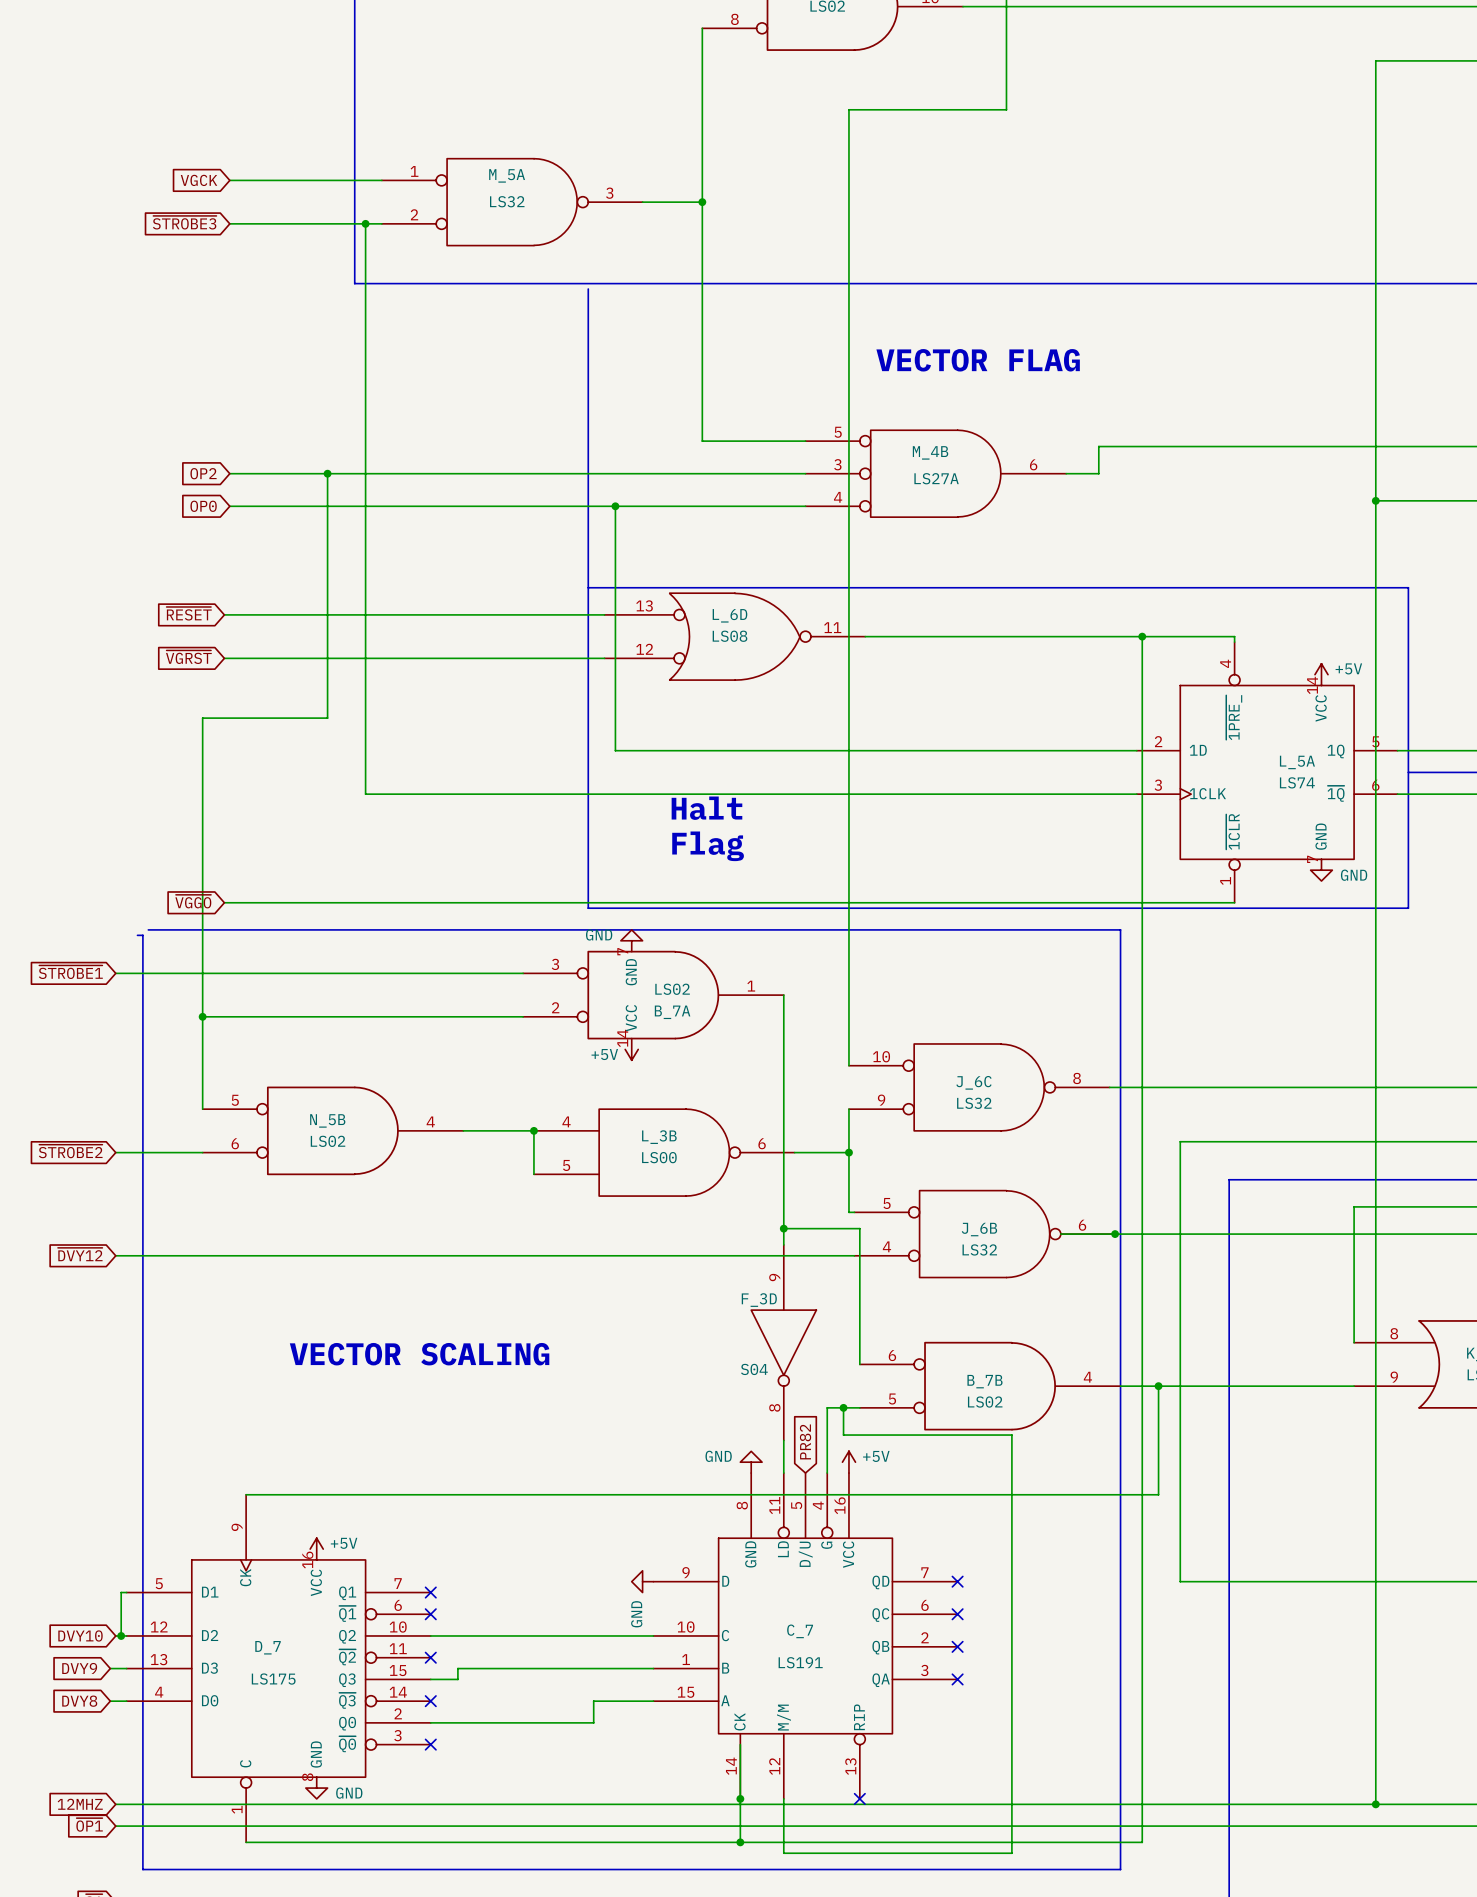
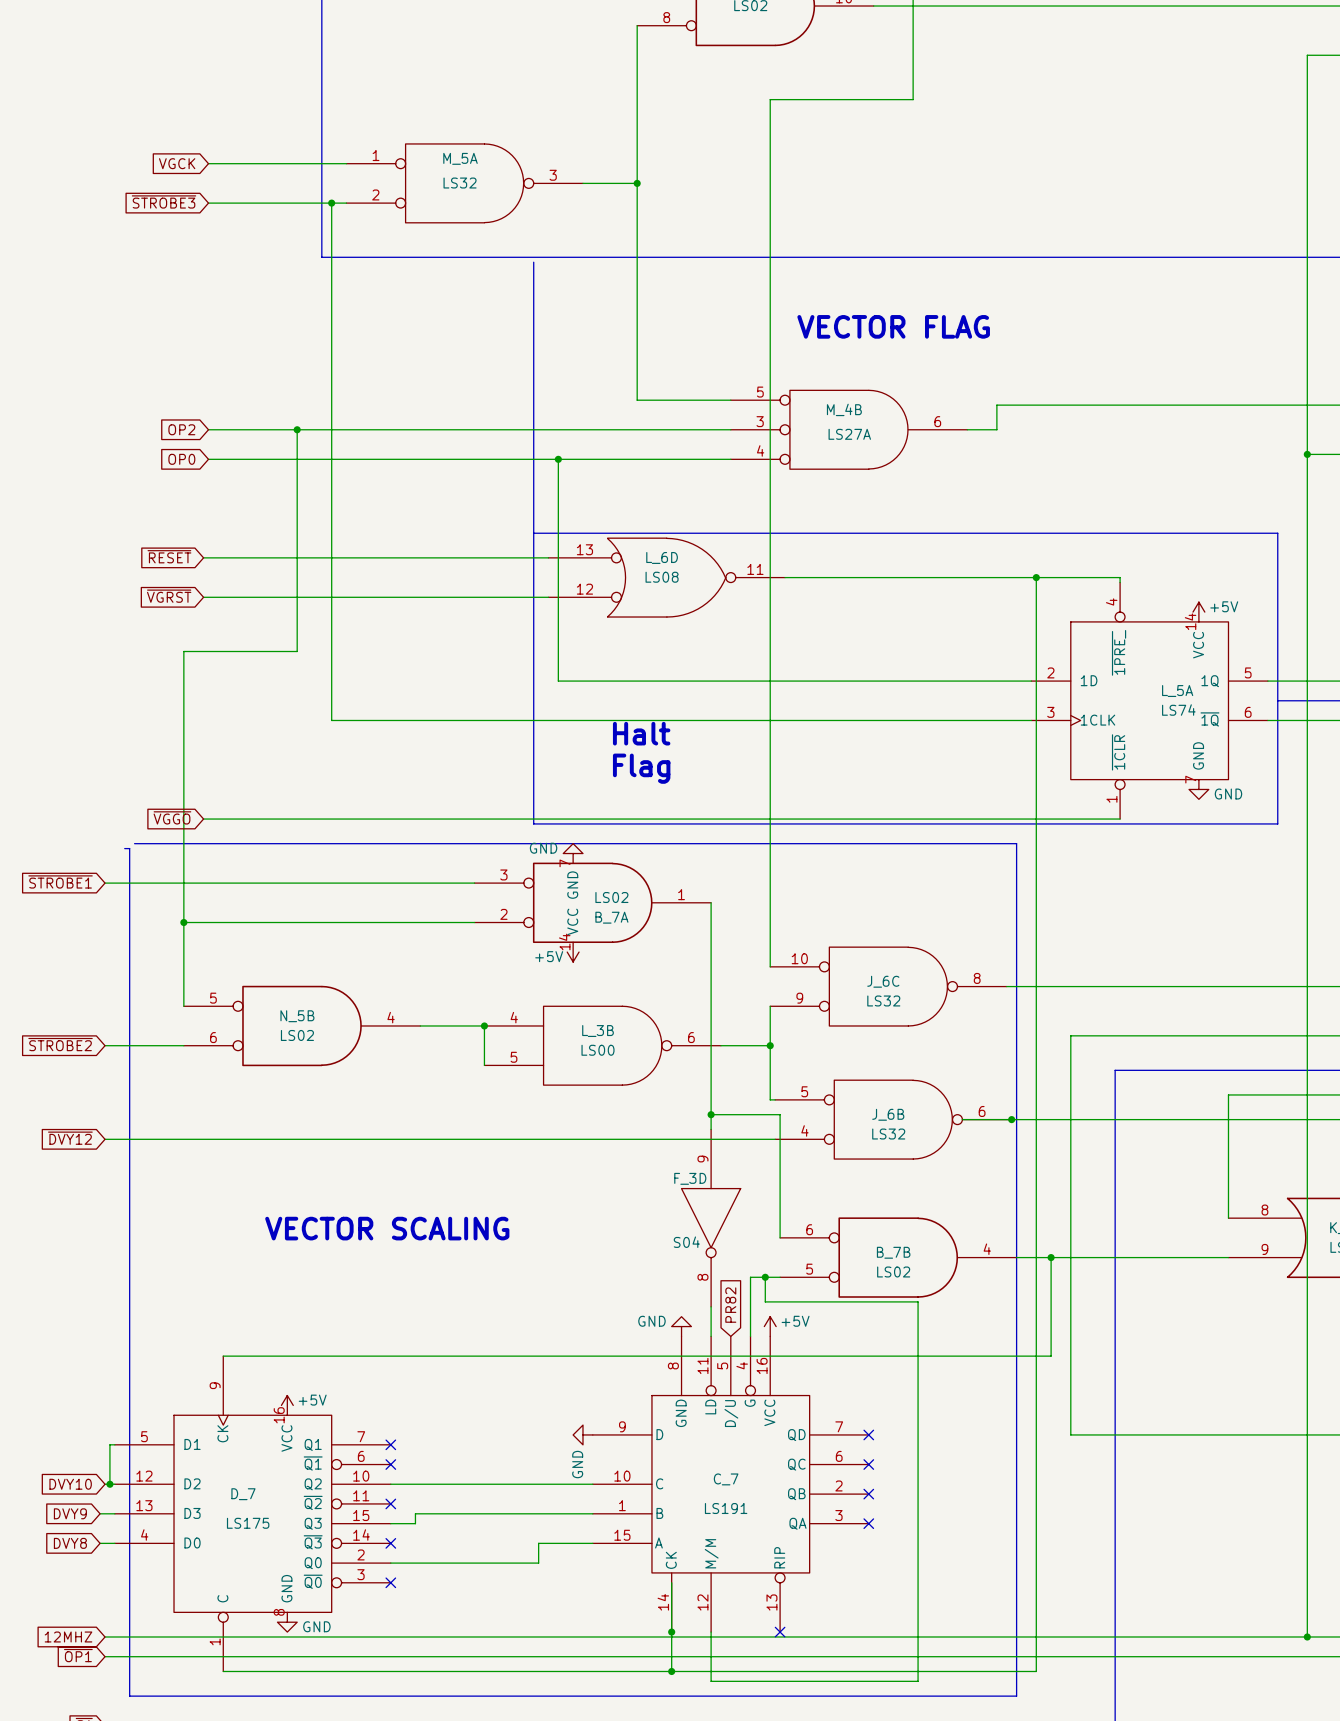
wire: (1440, 60) (1375, 60) (1375, 1804) -> (1307, 55) (1307, 1636)
wire: (1375, 500) (1440, 500) -> none
junction: (1375, 500) -> none
junction: none -> (1307, 454)
junction: (1375, 1804) -> none
junction: none -> (1307, 1636)

